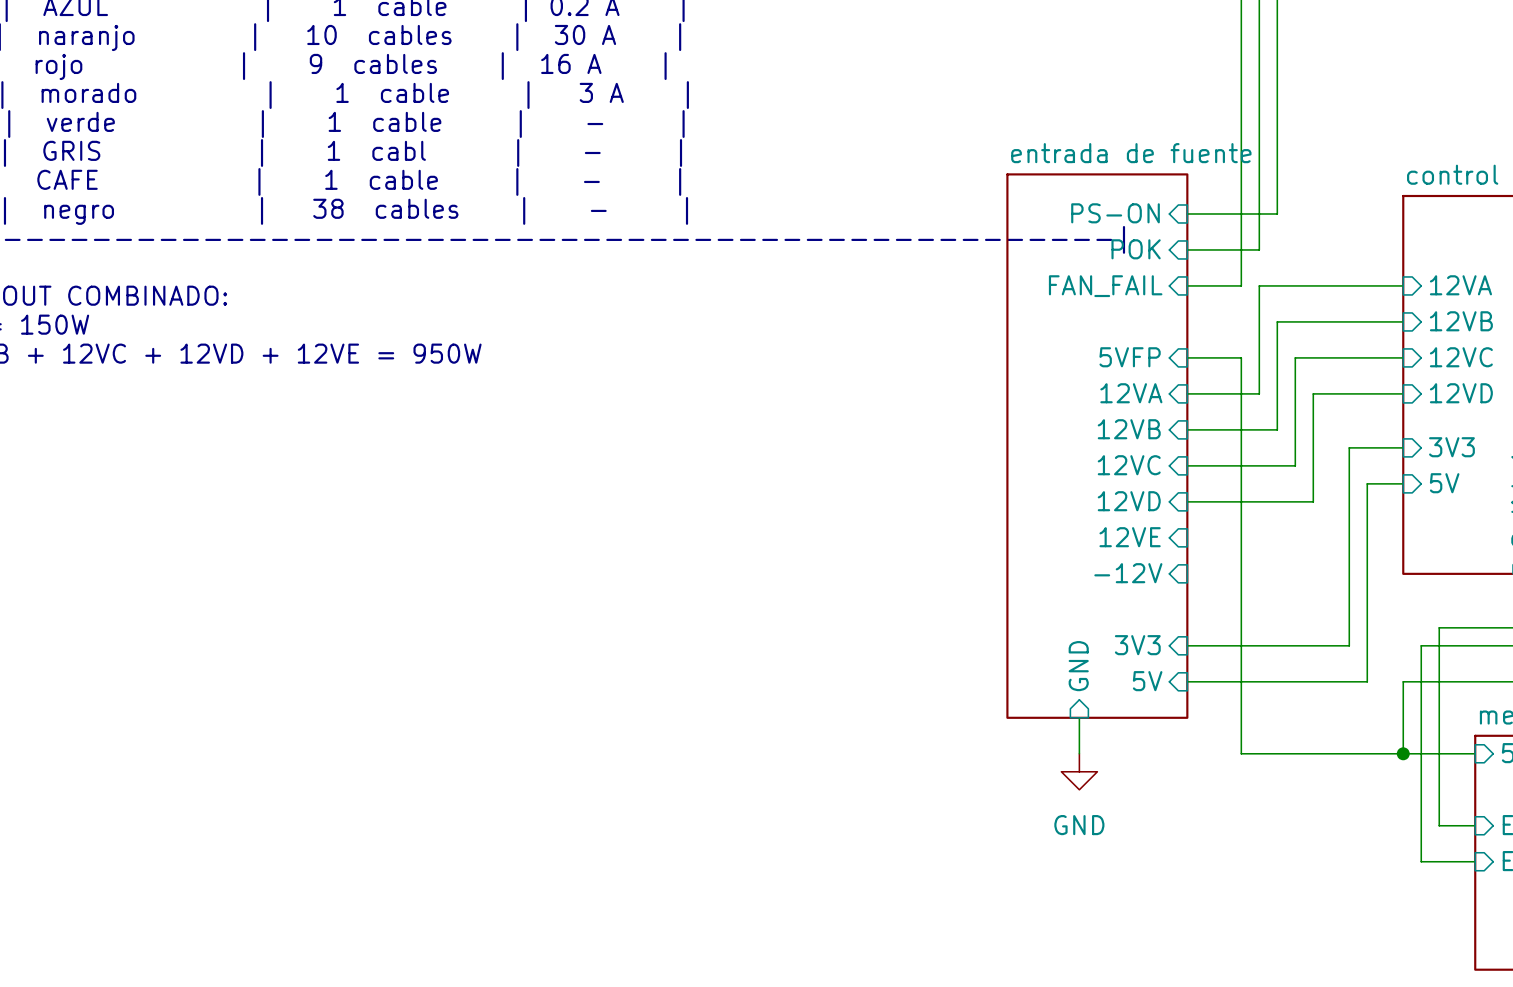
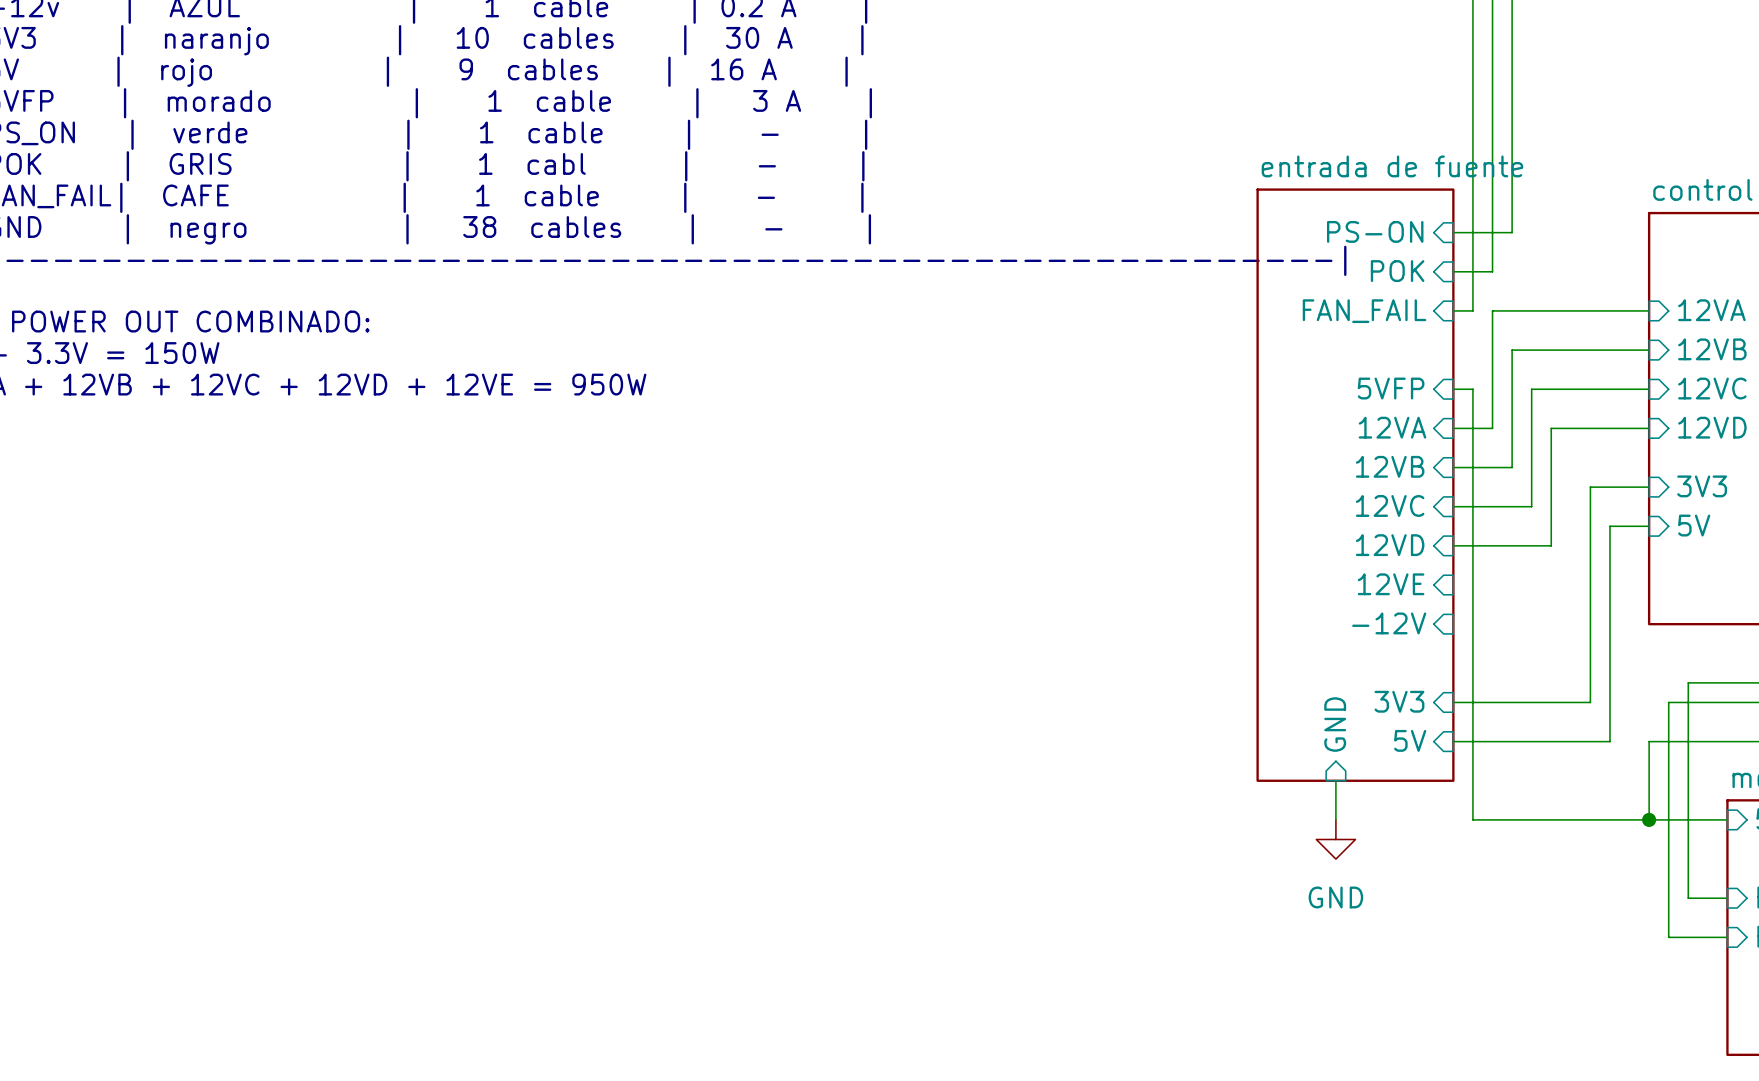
sheet pin position: PS-ON (1115, 213) -> PS-ON (1375, 231)
wire: (1187, 213) (1223, 213) -> none
sheet pin position: POK (1136, 249) -> POK (1397, 271)
wire: (1187, 249) (1223, 249) -> none
wire: (1187, 285) (1223, 285) -> none
sheet pin position: FAN_FAIL (1105, 286) -> FAN_FAIL (1364, 311)
sheet pin position: 5VFP (1130, 357) -> 5VFP (1391, 388)
wire: (1187, 357) (1223, 357) -> none
sheet pin position: 12VA (1131, 393) -> 12VA (1392, 427)
wire: (1187, 393) (1223, 393) -> none
sheet pin position: 12VB (1129, 429) -> 12VB (1390, 466)
wire: (1187, 429) (1223, 429) -> none
sheet entrada de fuente position: (1097, 446) -> (1355, 485)
sheet pin position: 12VC (1129, 465) -> 12VC (1390, 505)
wire: (1187, 465) (1223, 465) -> none
sheet pin position: 12VD (1129, 501) -> 12VD (1390, 545)
wire: (1187, 501) (1223, 501) -> none
sheet pin position: 12VE (1130, 537) -> 12VE (1391, 584)
sheet pin position: -12V (1128, 573) -> -12V (1389, 623)
sheet pin position: 3V3 (1137, 645) -> 3V3 (1399, 701)
wire: (1187, 645) (1223, 645) -> none
sheet pin position: GND (1078, 666) -> GND (1335, 724)
sheet pin position: 5V (1147, 681) -> 5V (1410, 740)
wire: (1187, 681) (1223, 681) -> none
wire: (1079, 717) (1079, 753) -> (1335, 780) (1335, 819)
power symbol position: GND (1079, 771) -> GND (1335, 839)

